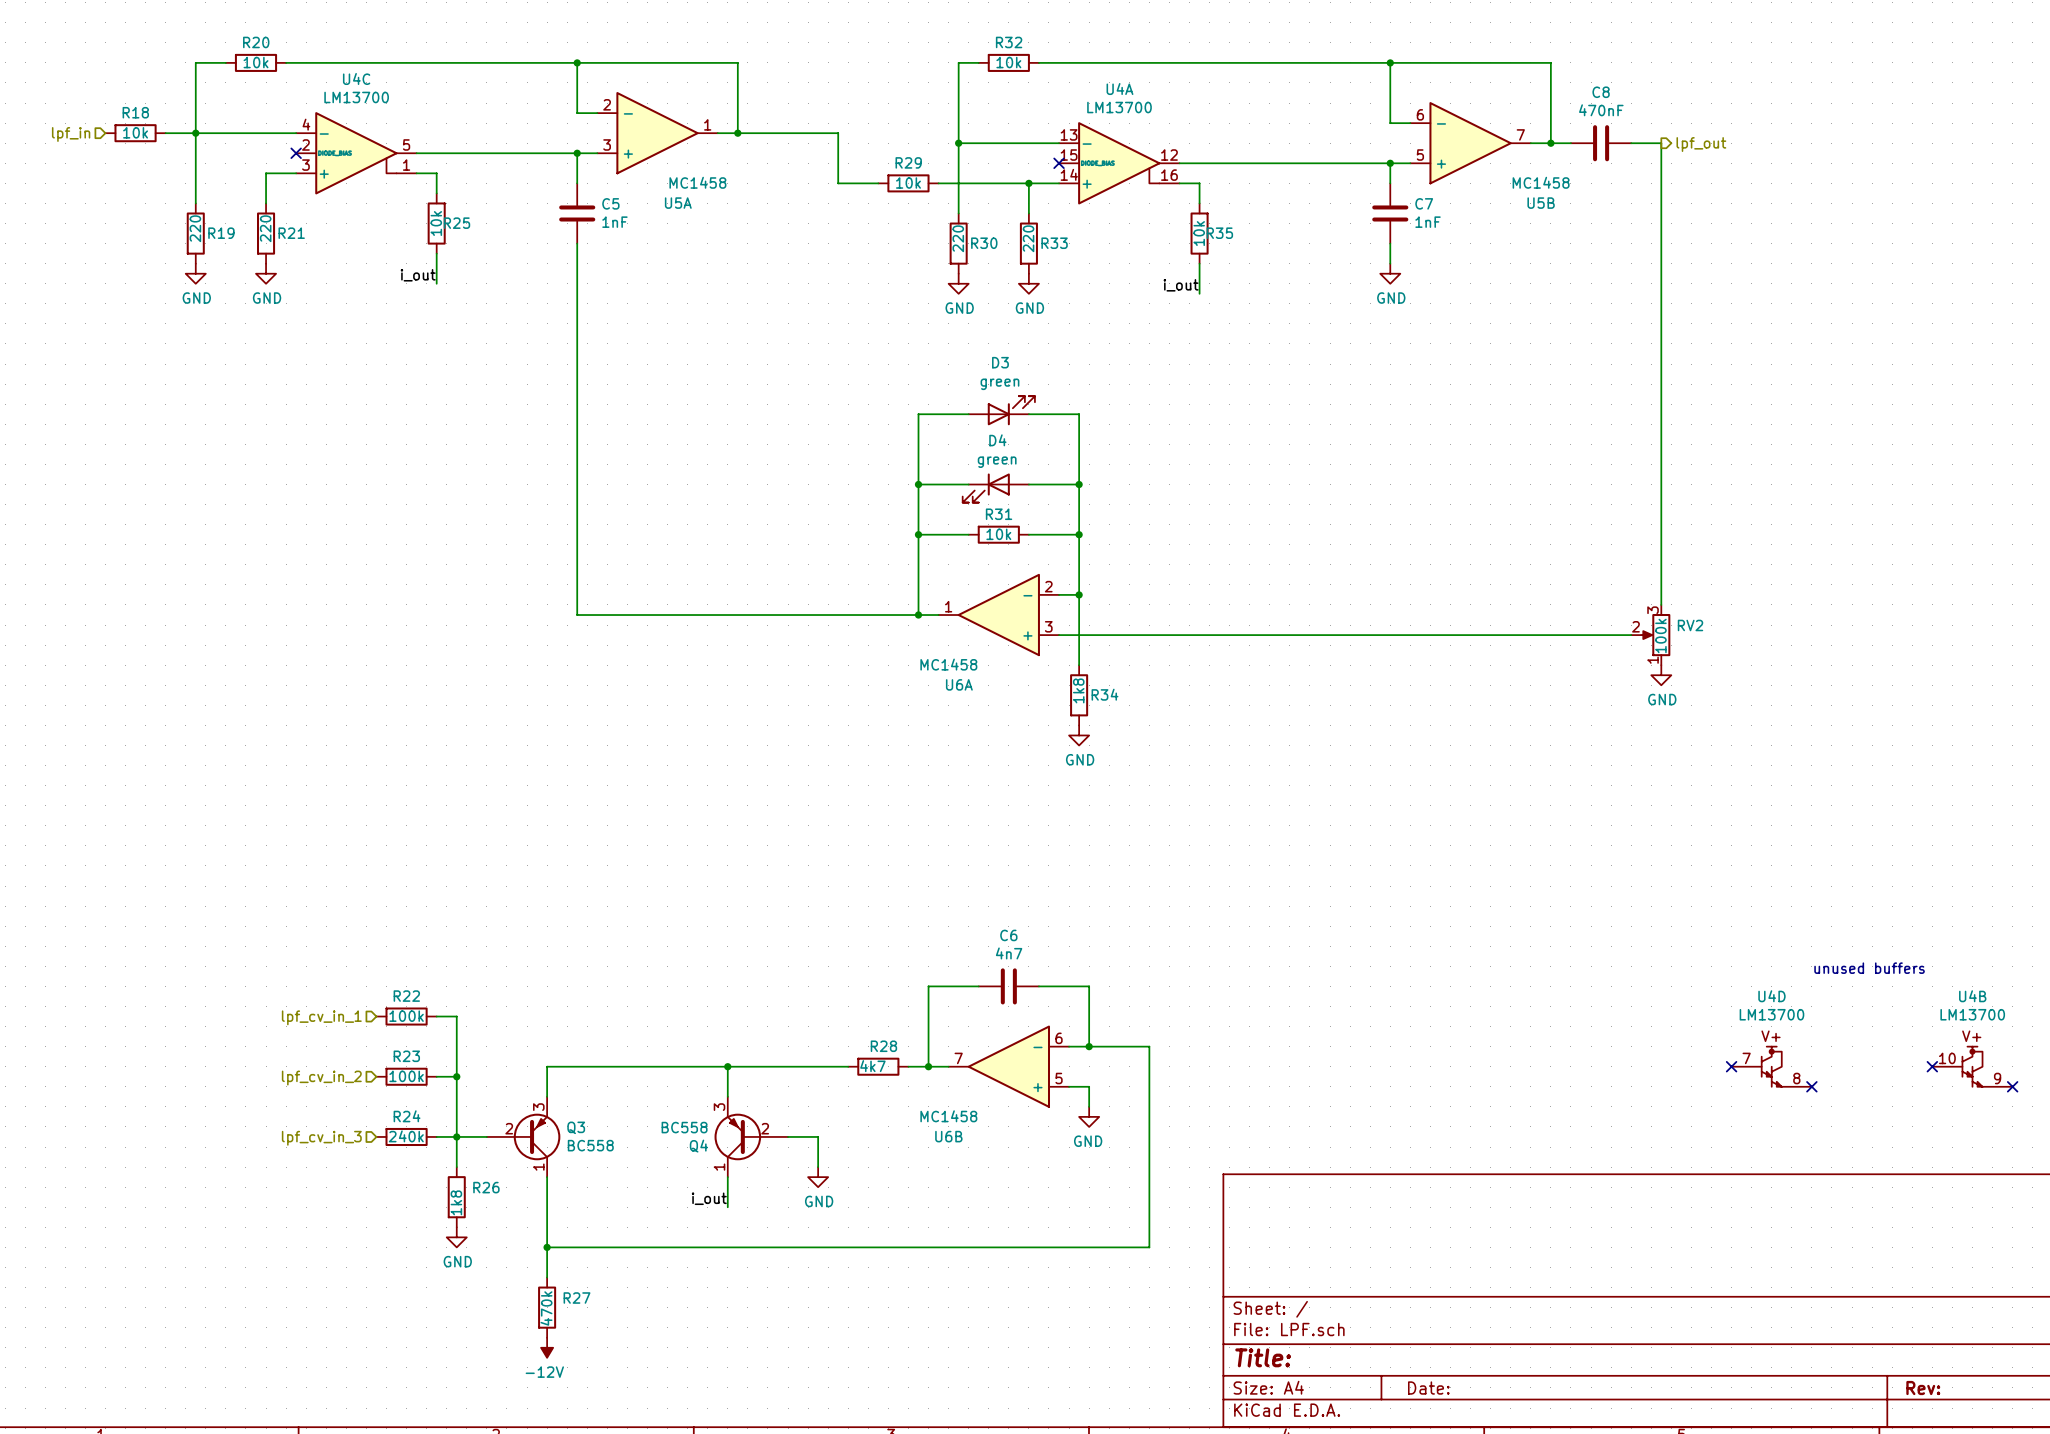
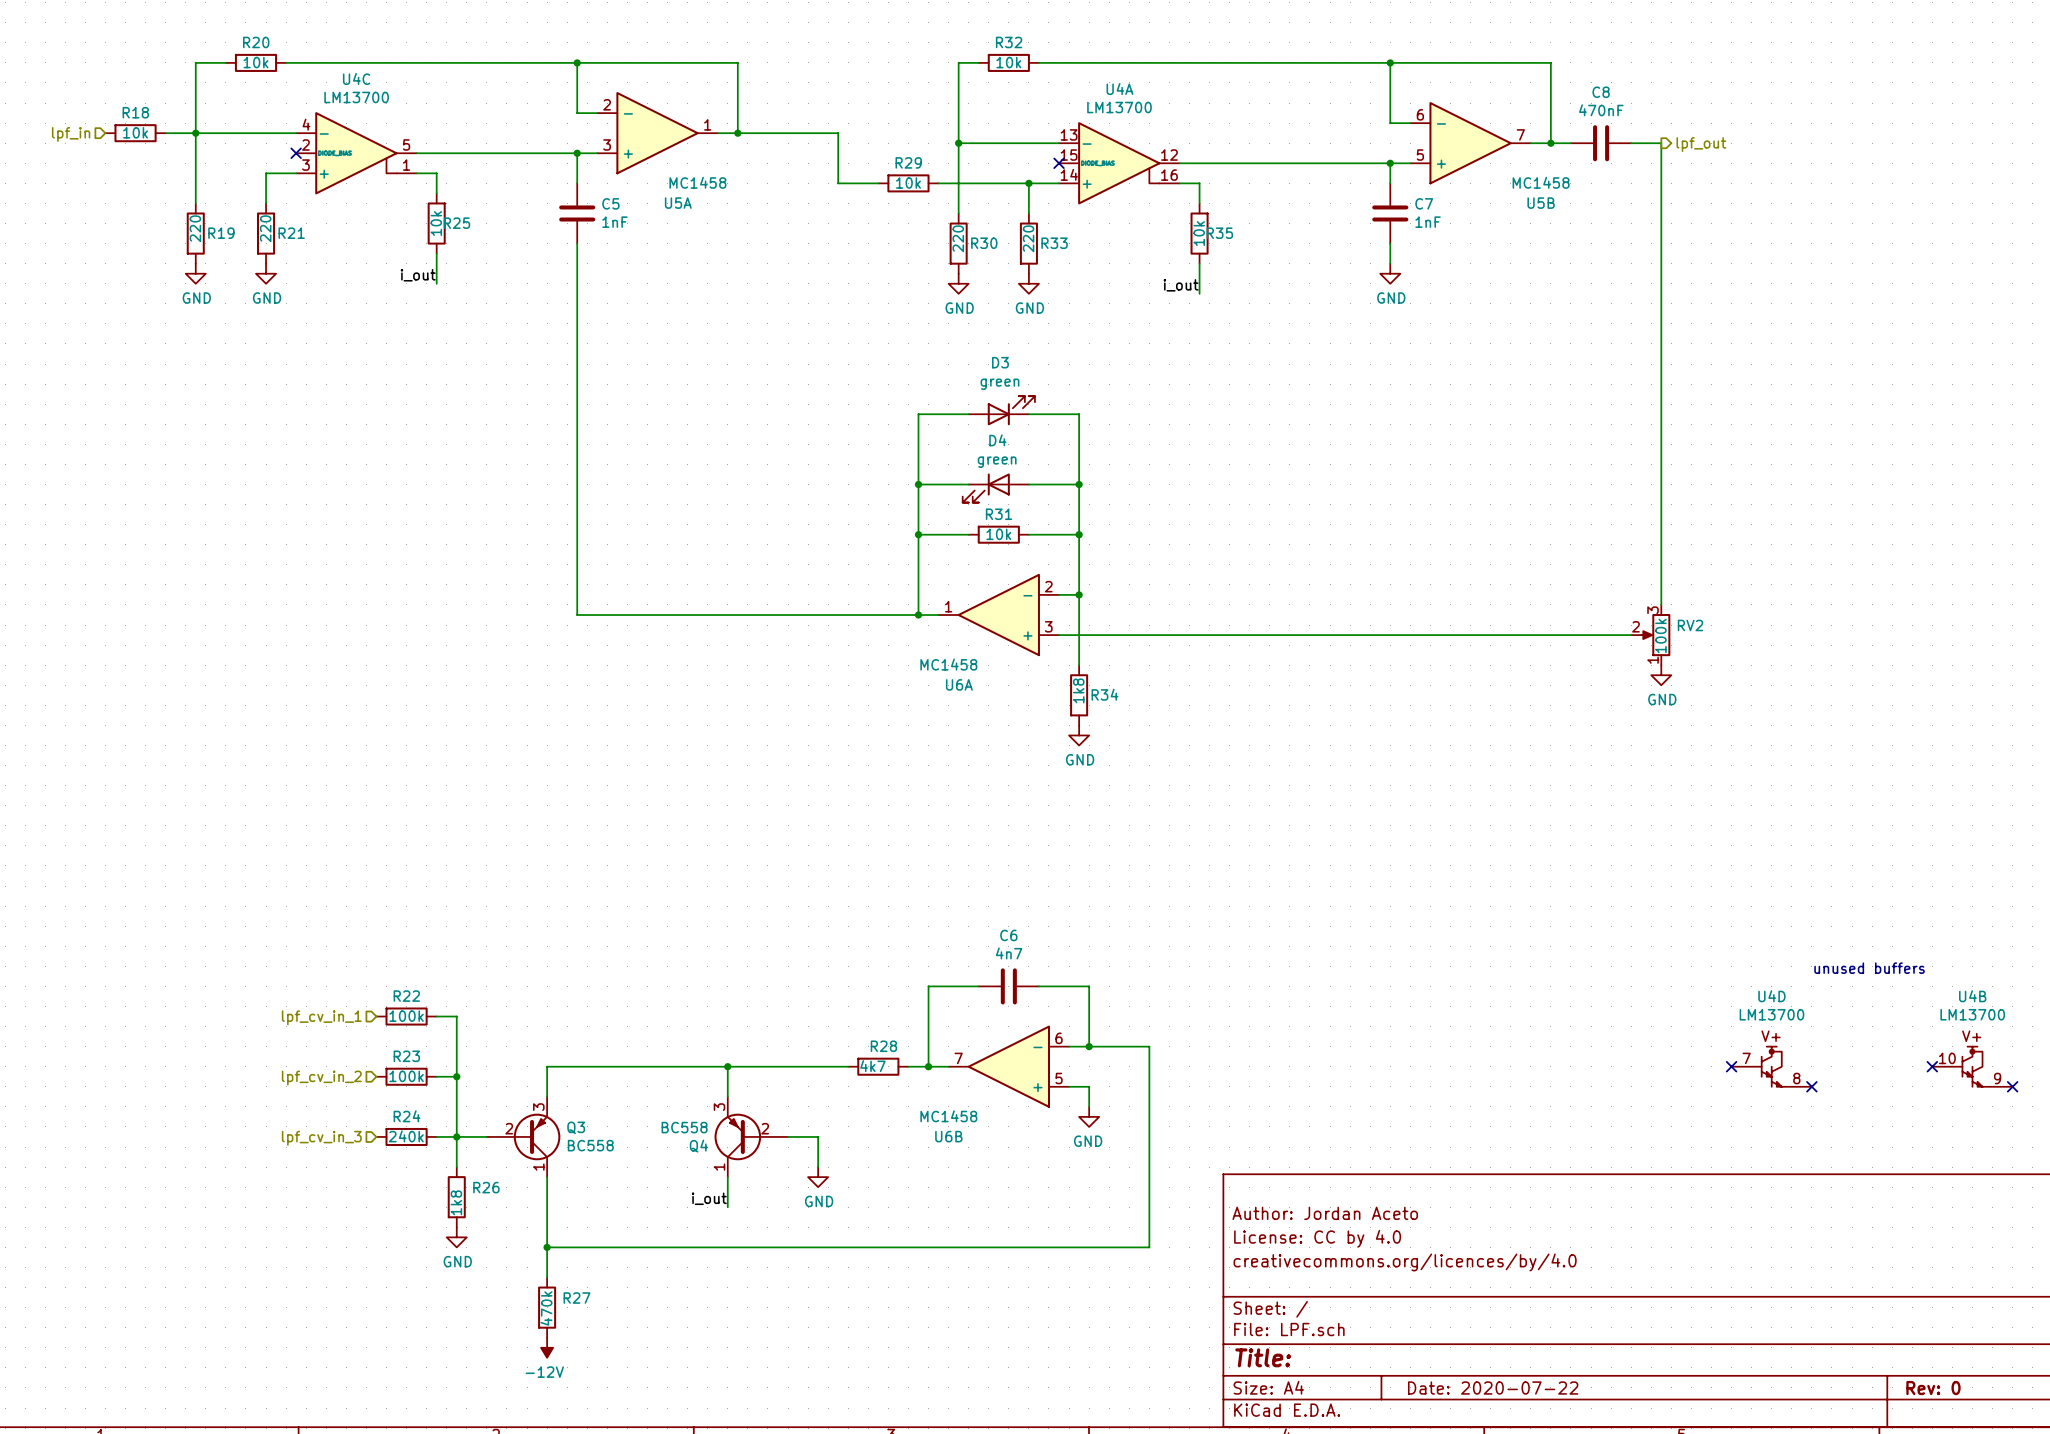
title block: none -> Author: Jordan Aceto (1325, 1213)
title block: none -> License: CC by 4.0 (1317, 1238)
title block: none -> creativecommons.org/licences/by/4.0 (1405, 1262)
title block: Date: (1428, 1388) -> Date: 2020-07-22 (1493, 1388)
title block: Rev: (1923, 1388) -> Rev: 0 (1933, 1388)

